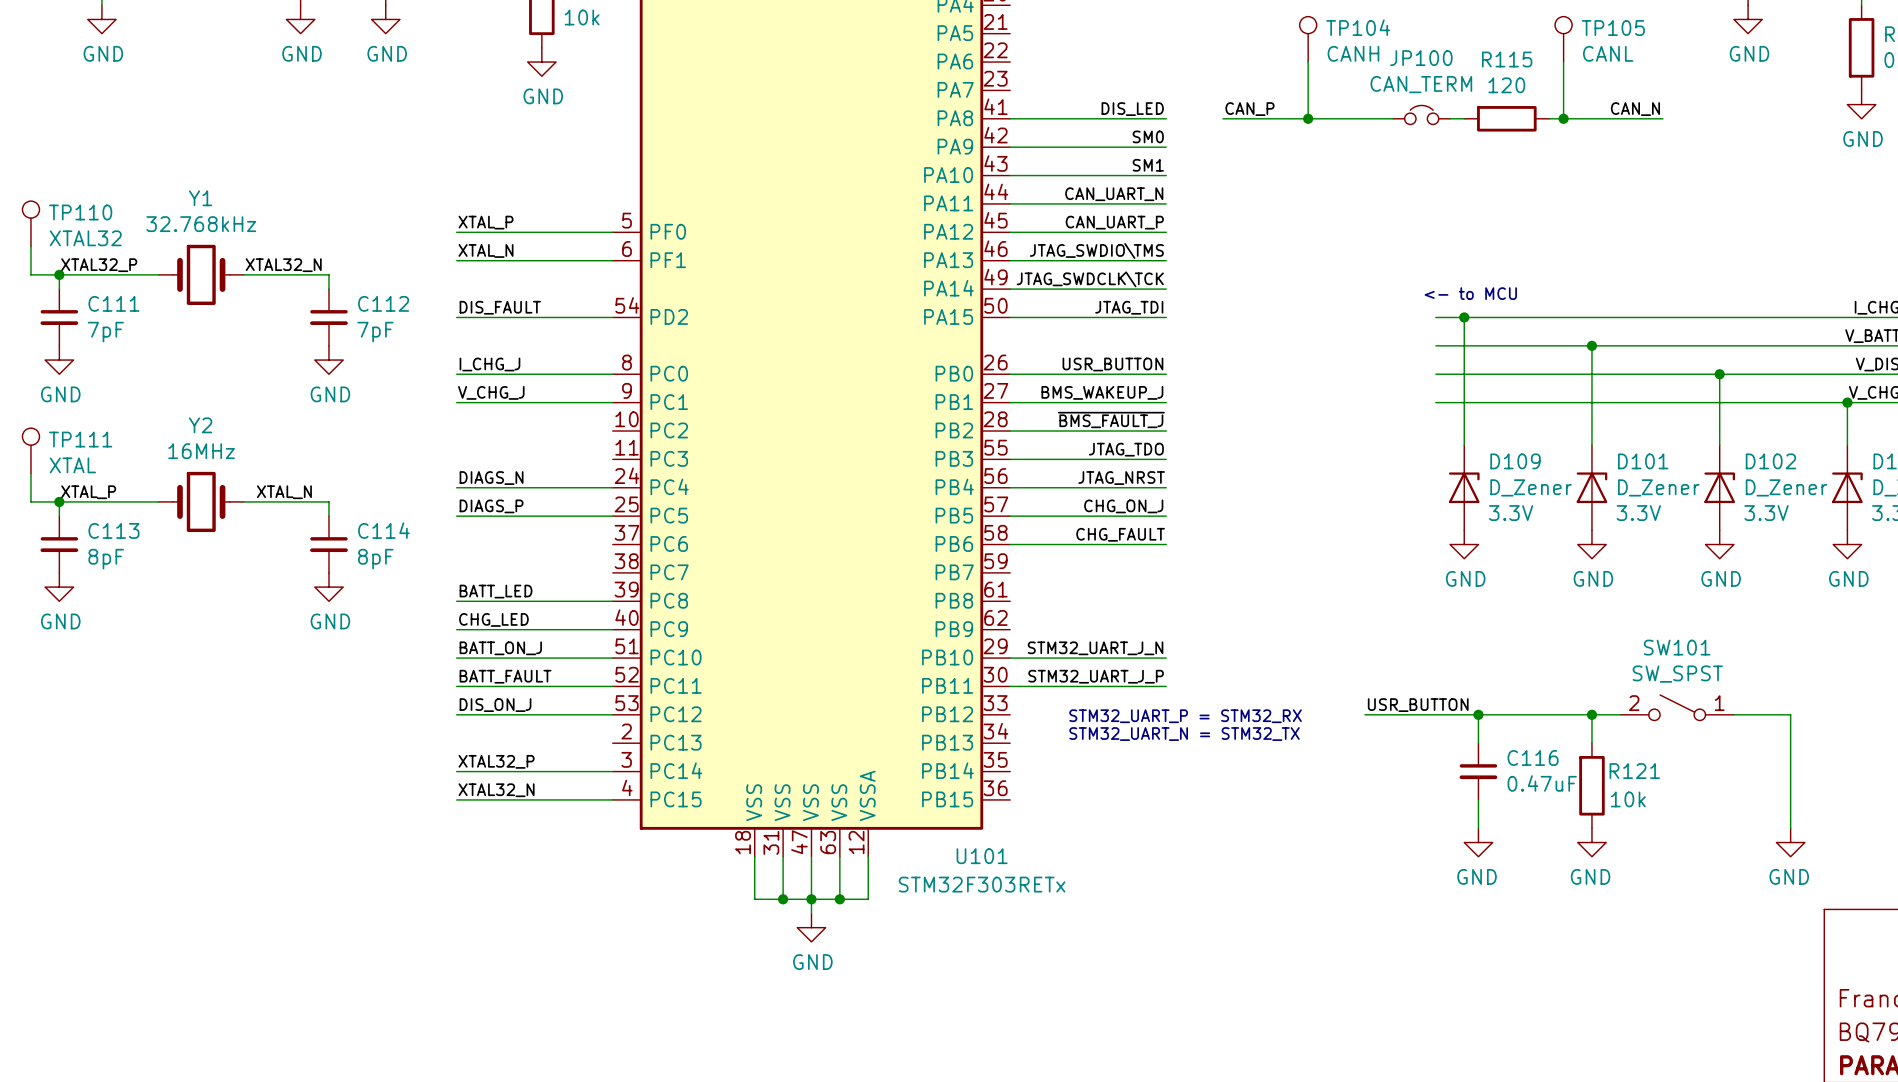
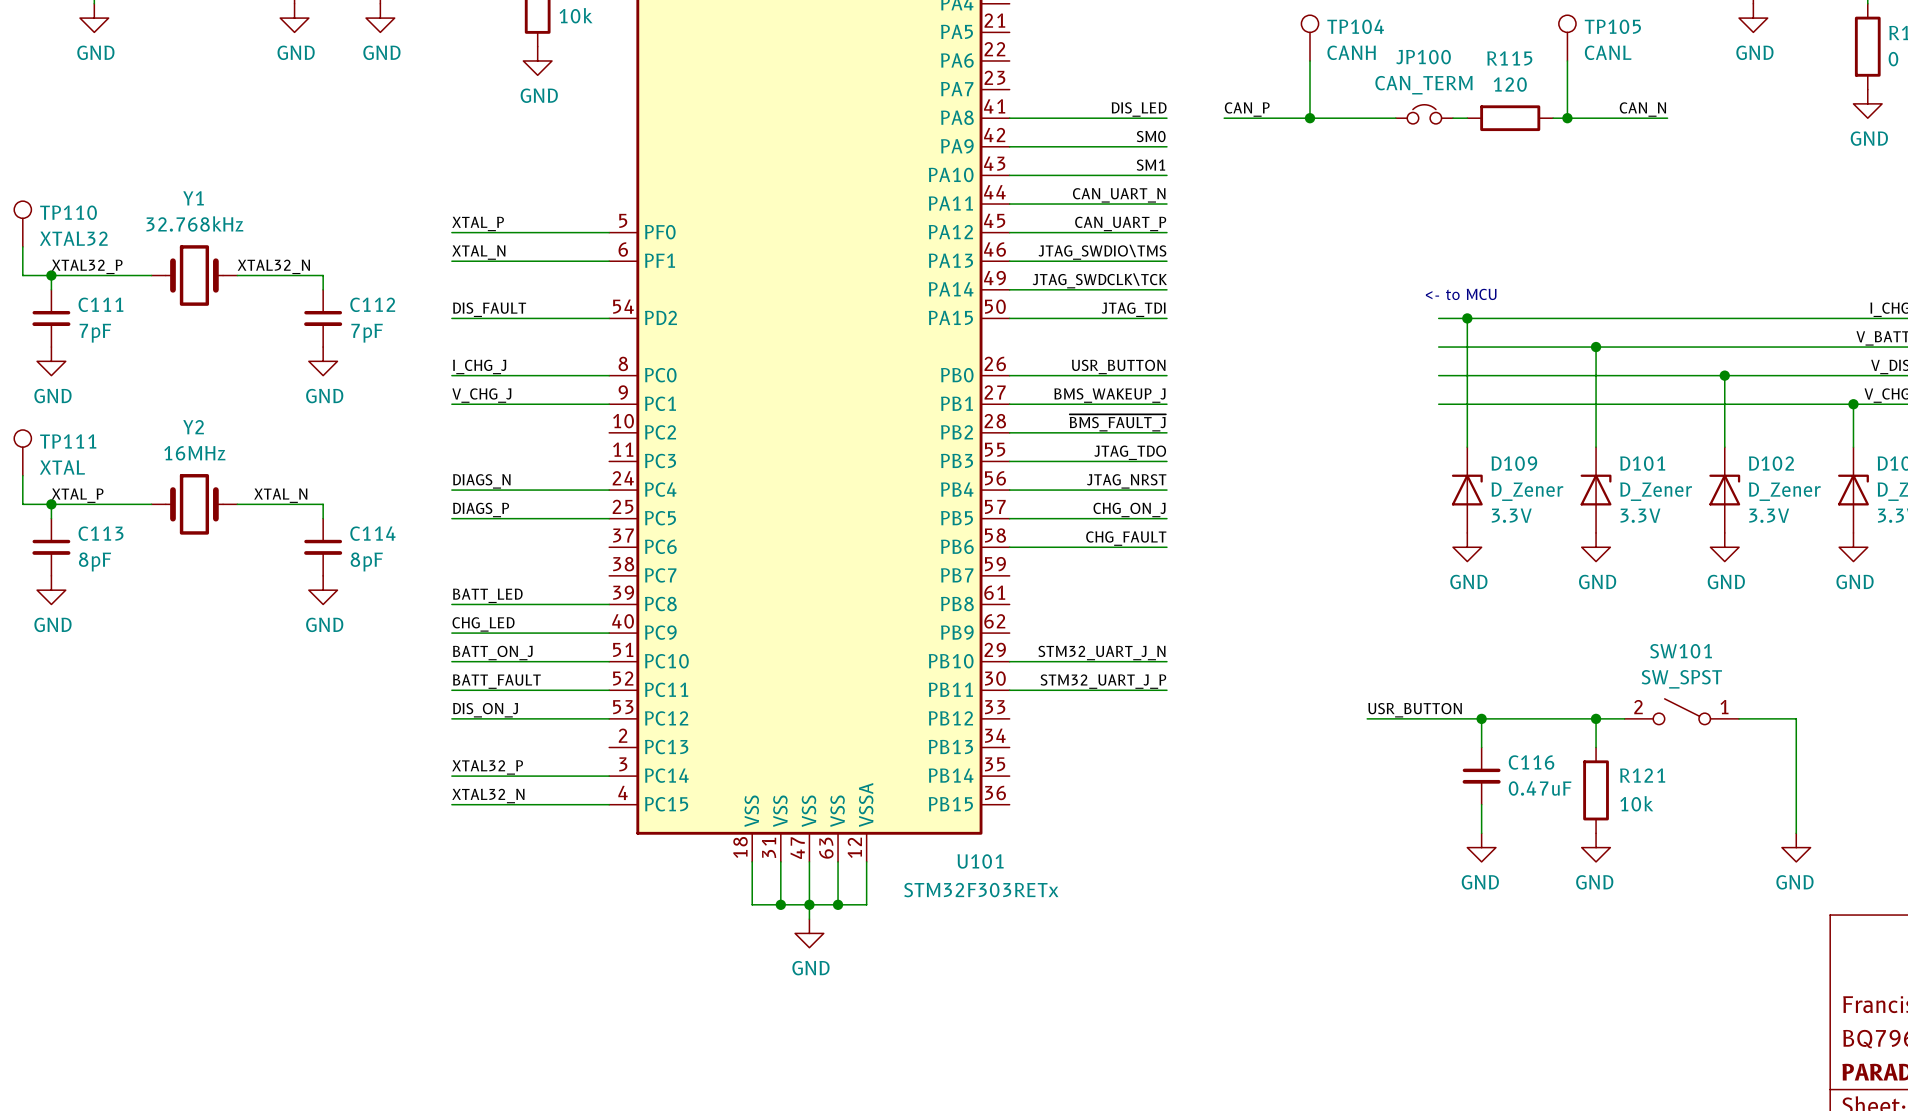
text: STM32_UART_P = STM32_RX (1185, 716) -> none
text: STM32_UART_N = STM32_TX (1184, 734) -> none

